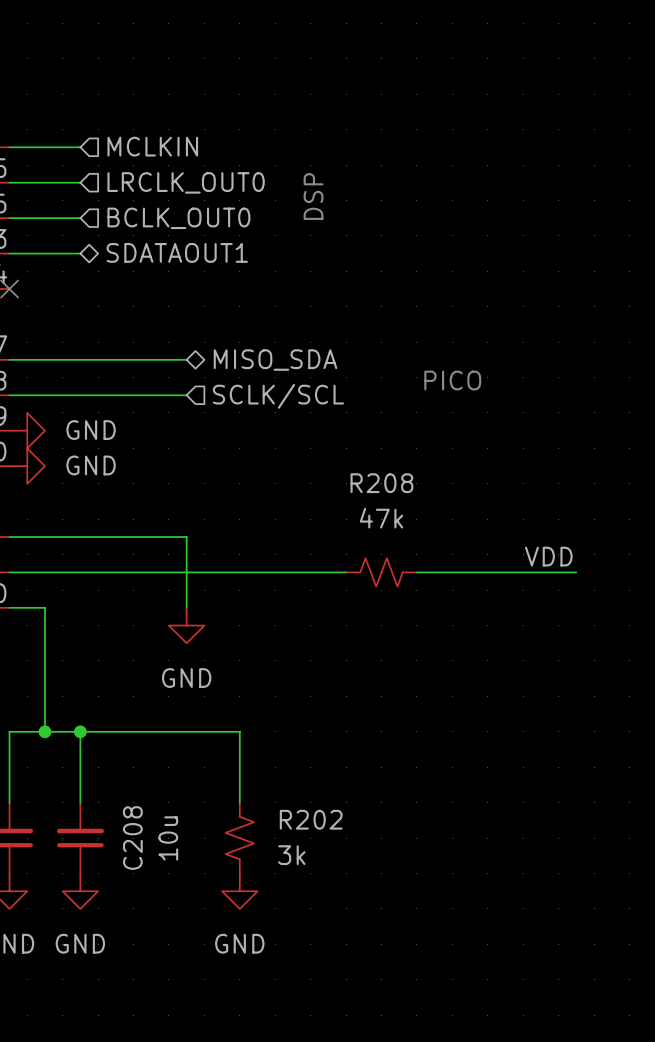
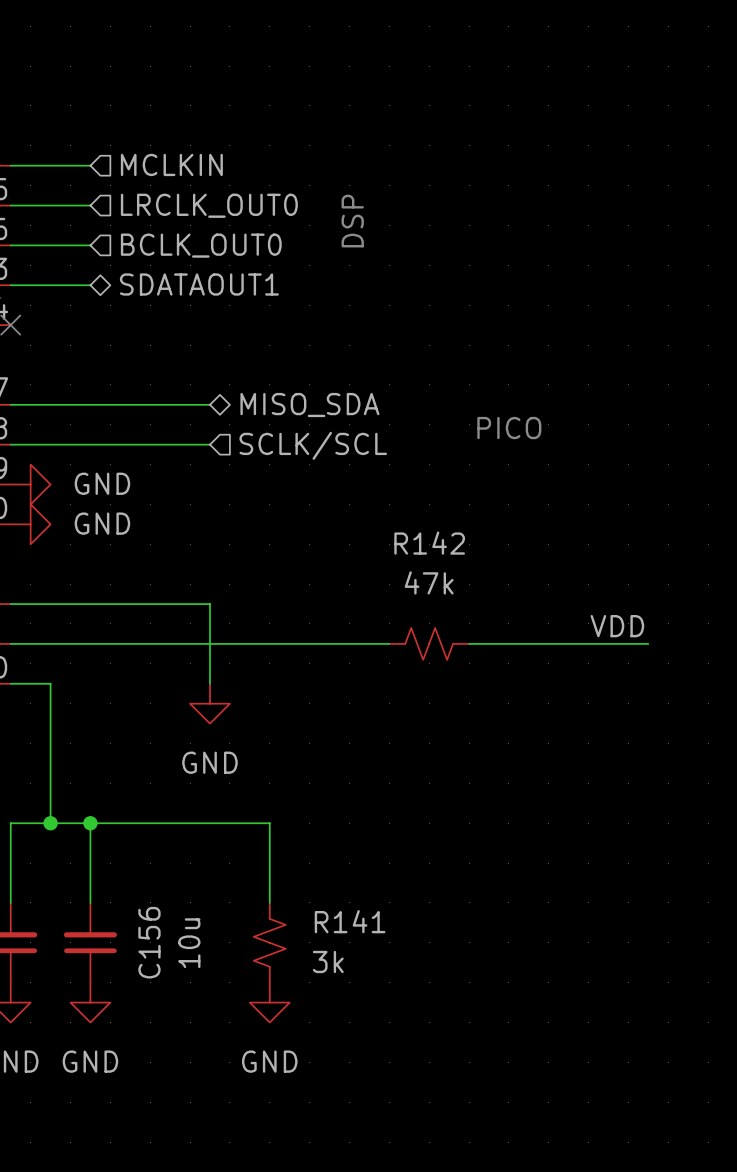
R208 name: R208 (381, 483) -> R142 (429, 543)
R202 name: R202 (311, 819) -> R141 (350, 921)
C208 name: C208 (132, 838) -> C156 (149, 942)

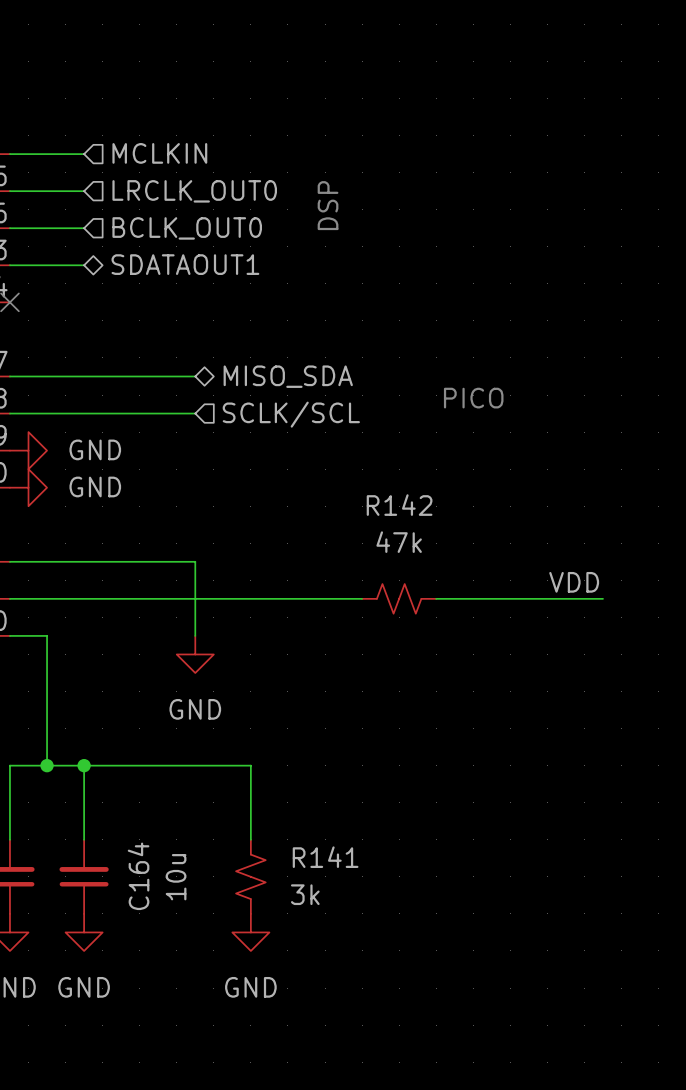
C156 name: C156 (149, 942) -> C164 (138, 876)

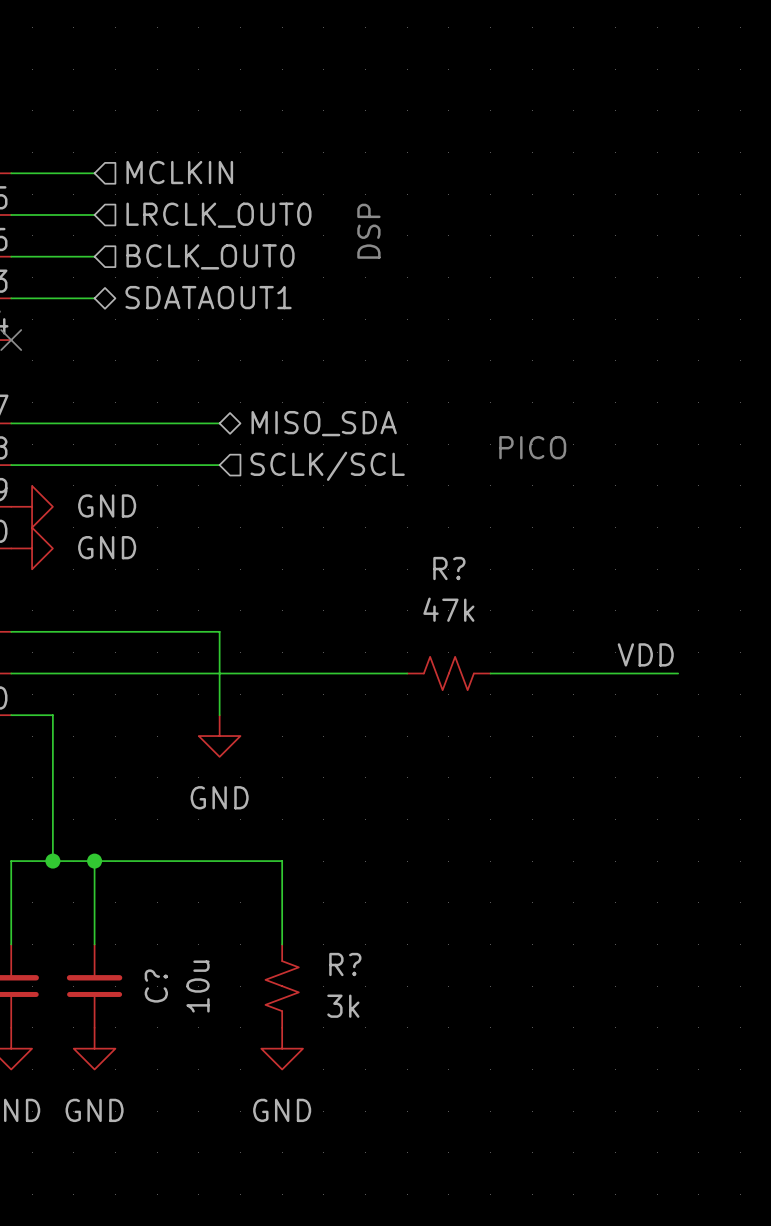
R142 name: R142 (399, 505) -> R? (449, 568)
R141 name: R141 (325, 857) -> R? (345, 964)
C164 name: C164 (138, 876) -> C? (156, 986)

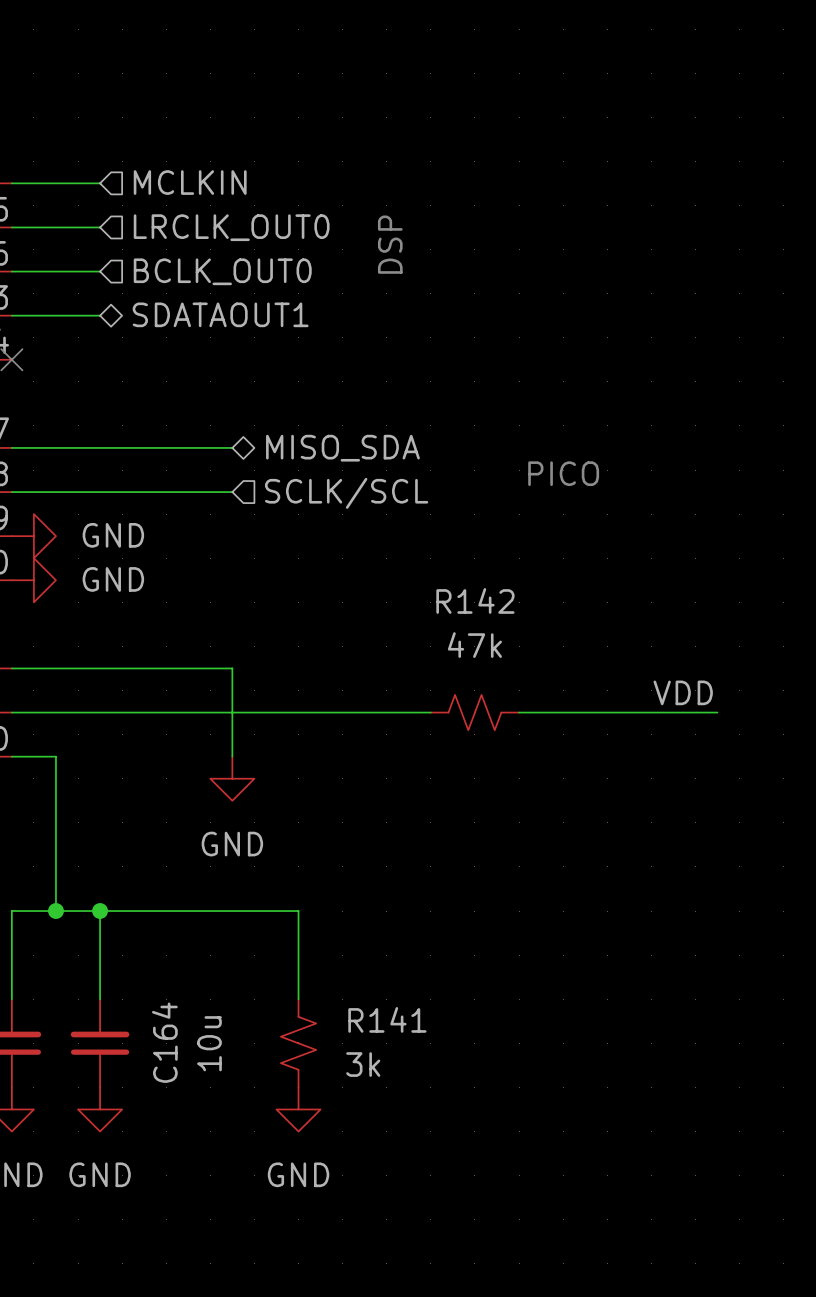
R? name: R? (449, 568) -> R142 (475, 600)
R? name: R? (345, 964) -> R141 (387, 1019)
C? name: C? (156, 986) -> C164 (164, 1042)

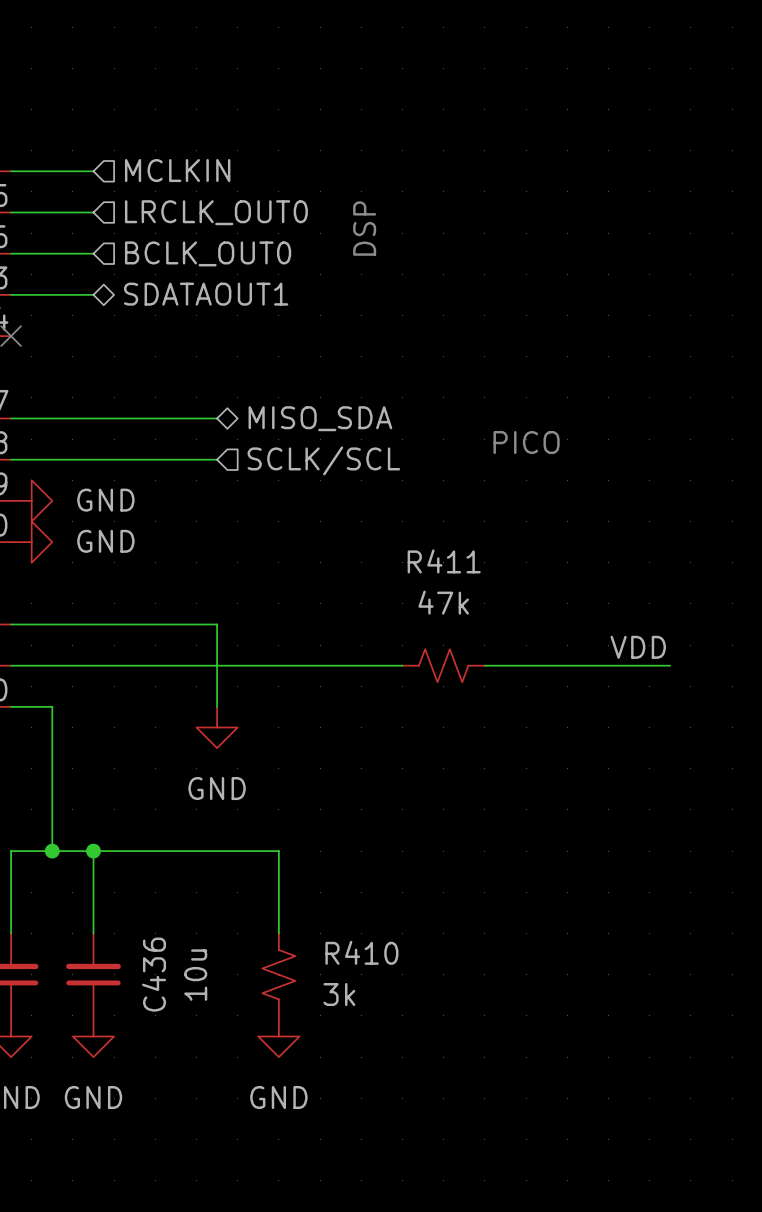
R142 name: R142 (475, 600) -> R411 (444, 561)
R141 name: R141 (387, 1019) -> R410 (361, 952)
C164 name: C164 (164, 1042) -> C436 (154, 974)

